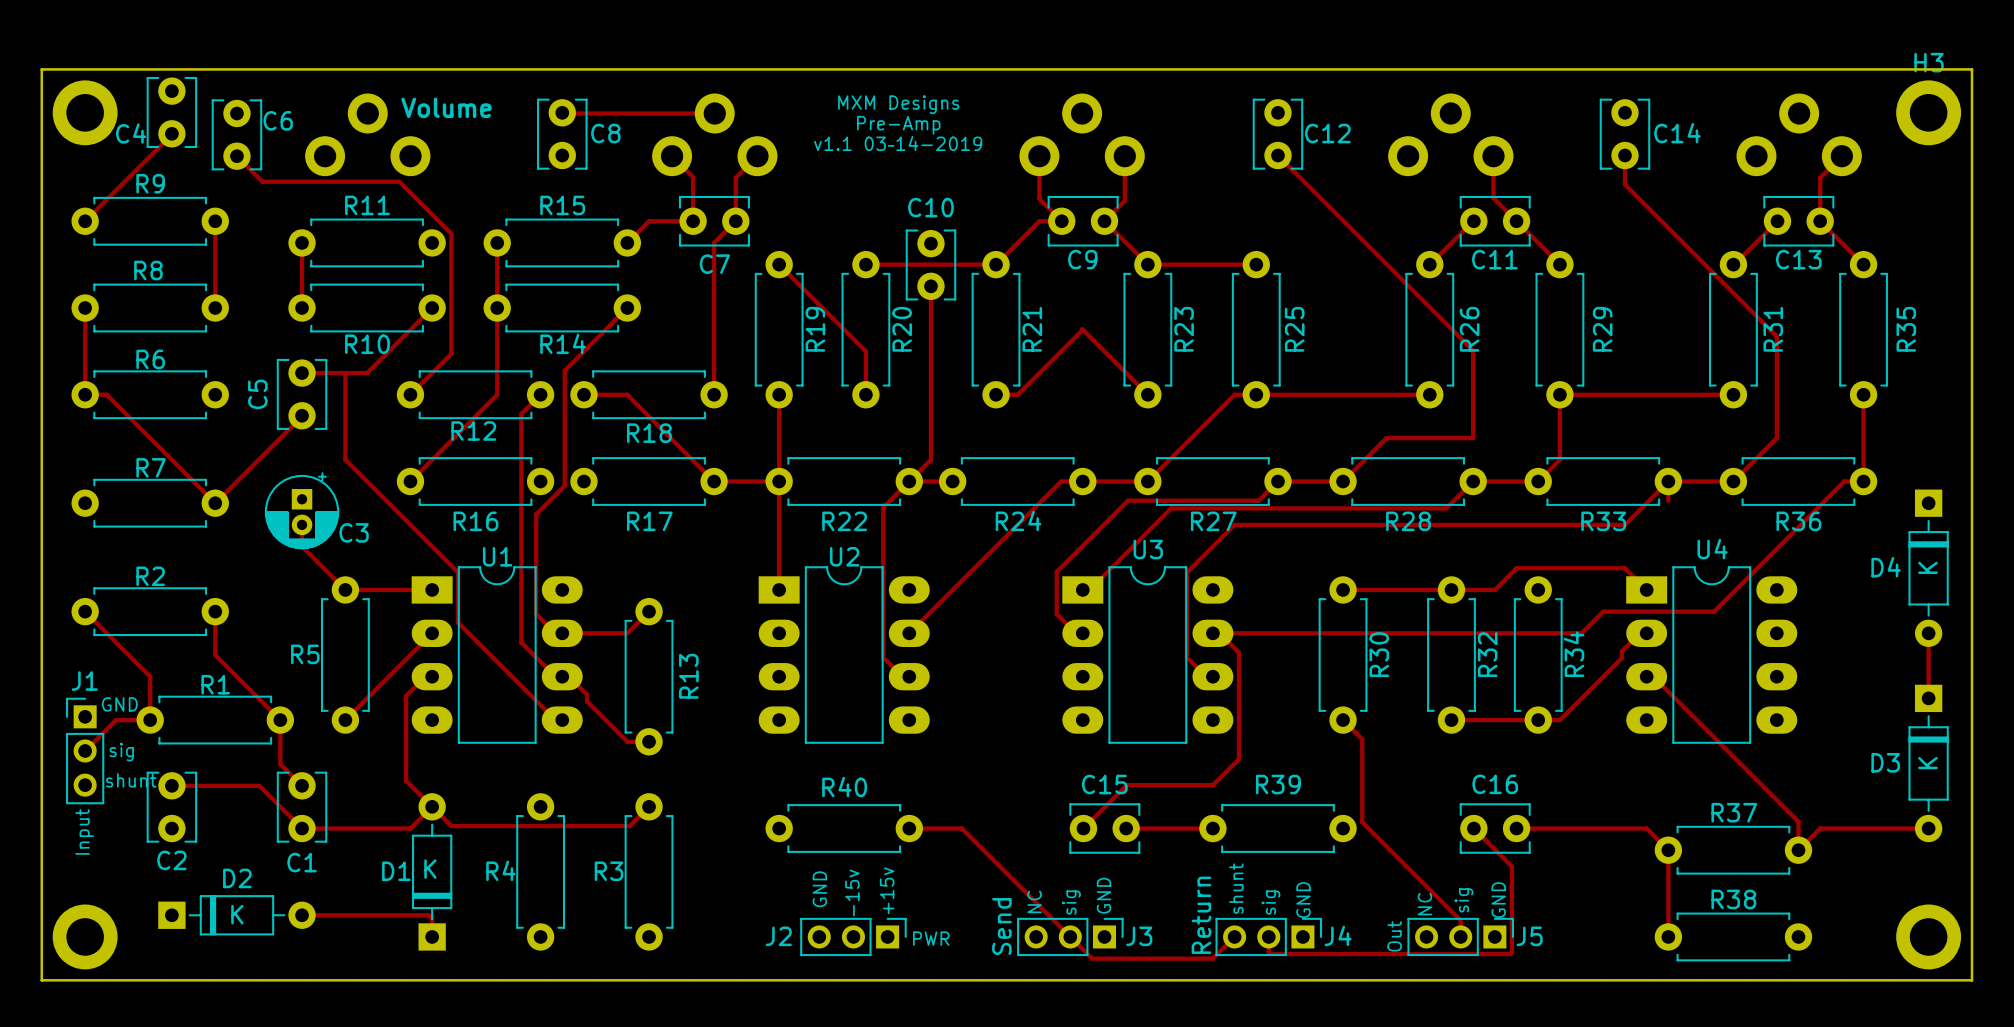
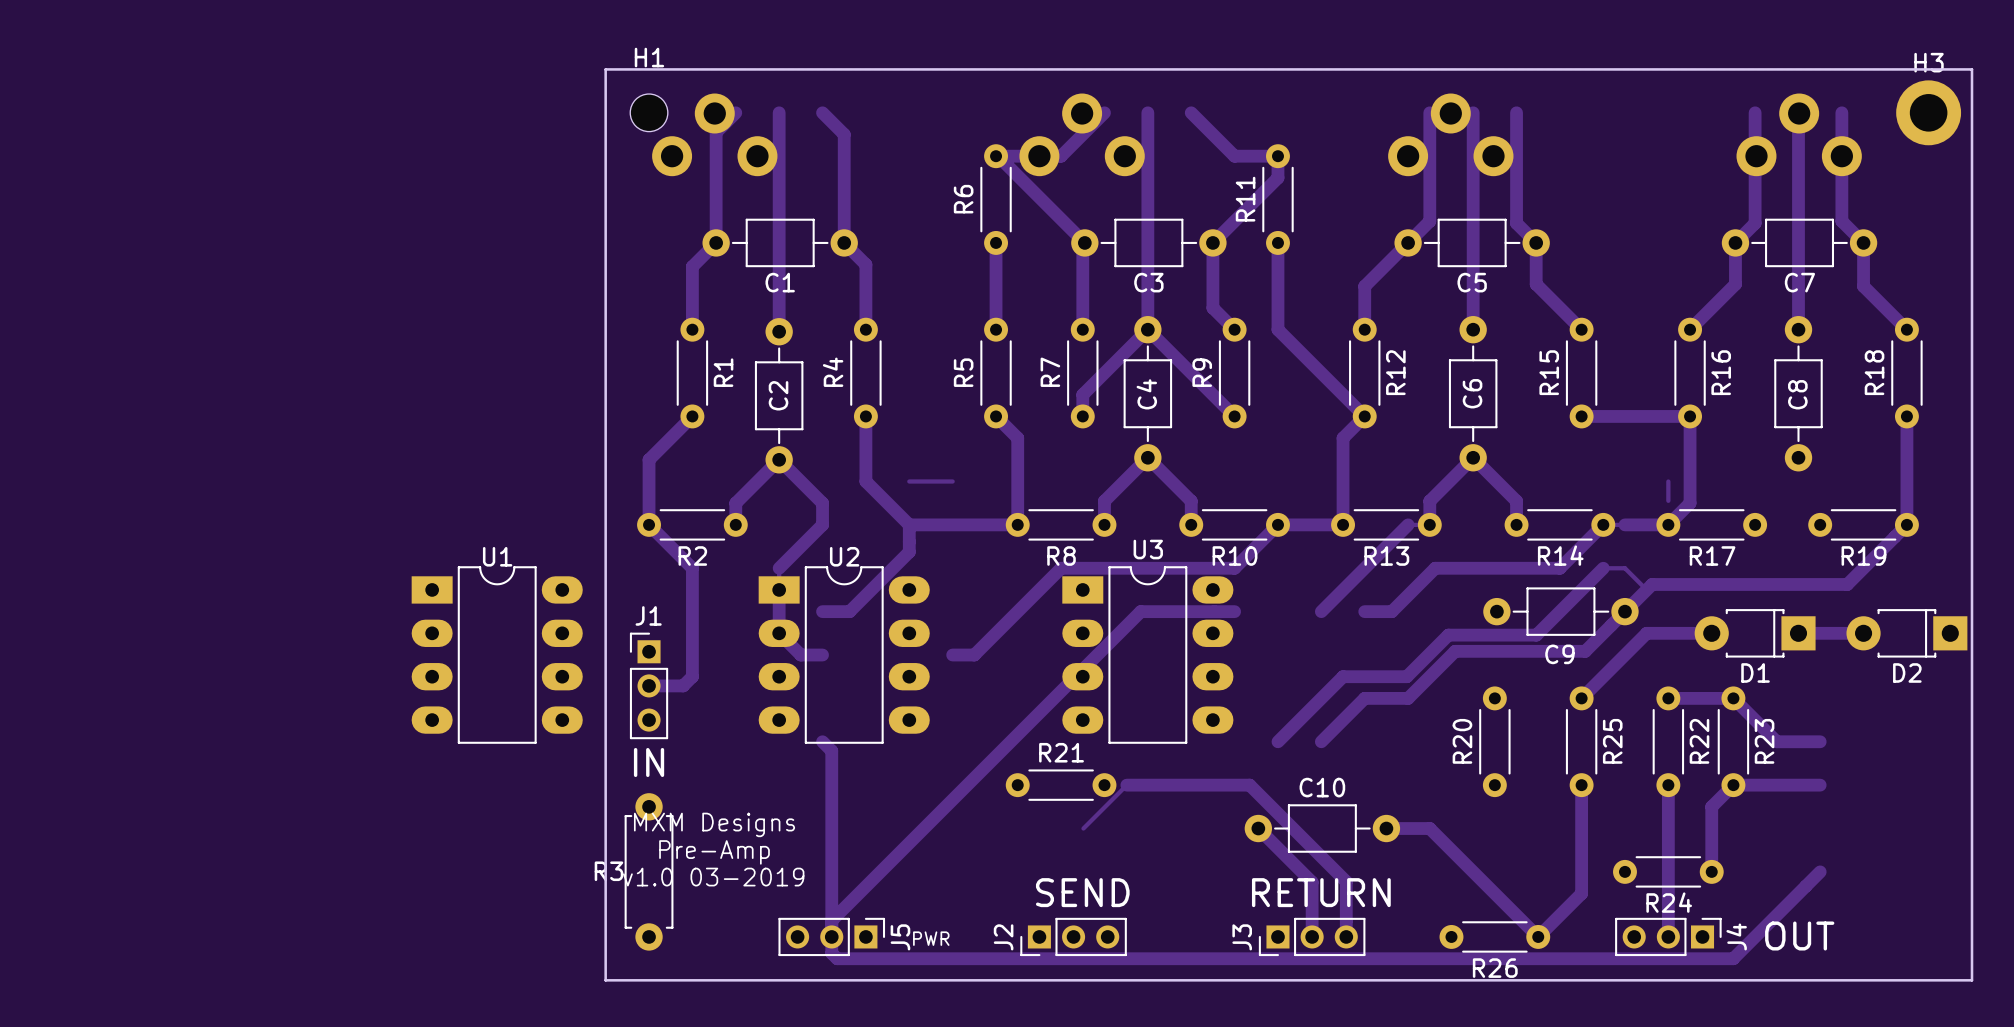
board edge: (605, 69) (41, 69) (41, 980) (605, 980) -> (605, 69) (605, 980)
C4 footprint: [146, 76, 198, 148] -> [1123, 316, 1173, 472]
C8 footprint: [537, 98, 588, 170] -> [1774, 316, 1823, 472]
C6 footprint: [211, 99, 263, 171] -> [1448, 316, 1498, 472]
text: MXM Designs (898, 104) -> none
text: Volume (446, 107) -> none
part: (85, 112) -> none
track: (562, 112) (714, 113) -> none
H1: none -> (649, 112)
track: none -> (735, 112) (716, 132) (716, 242) (692, 266) (692, 329)
track: none -> (779, 112) (779, 331)
track: none -> (822, 112) (844, 134) (844, 242) (865, 264) (865, 329)
track: none -> (1104, 112) (1061, 156) (996, 156)
track: none -> (1147, 112) (1147, 329)
track: none -> (1191, 112) (1234, 156) (1277, 156) (1277, 177) (1212, 242) (1212, 308) (1234, 329)
track: none -> (1429, 112) (1429, 221) (1364, 286) (1364, 329)
track: none -> (1473, 112) (1473, 329)
track: none -> (1516, 112) (1516, 223) (1536, 242) (1536, 284) (1581, 329)
track: none -> (1755, 112) (1755, 223) (1735, 242) (1735, 284) (1690, 329)
track: none -> (1798, 112) (1798, 329)
track: none -> (1841, 112) (1841, 221) (1863, 242) (1863, 286) (1906, 329)
C6 name position: C6 (278, 120) -> C6 (1472, 393)
text: Pre-Amp (898, 125) -> none
C4 name position: C4 (131, 133) -> C4 (1146, 394)
track: (171, 133) (85, 221) -> none
C8 name position: C8 (605, 133) -> C8 (1797, 394)
part: (367, 134) -> none
C12: (1277, 134) -> none
C14: (1624, 134) -> none
text: v1.1 03–14-2019 (898, 143) -> none
track: (1277, 155) (1473, 350) (1473, 438) (1386, 438) (1343, 481) (1277, 481) (1258, 500) (1127, 500) (1056, 571) (1056, 614) (1075, 633) (1082, 633) -> none
track: (1624, 155) (1624, 184) (1776, 336) (1776, 438) (1733, 481) (1668, 481) (1624, 524) -> (1581, 416) (1690, 416) (1690, 503) (1668, 524) (1624, 524)
track: (236, 156) (262, 181) (399, 181) (451, 233) (451, 353) (410, 394) -> none
track: (672, 156) (693, 177) (693, 221) (649, 221) (627, 242) -> none
track: (757, 156) (735, 177) (735, 221) (714, 242) (714, 394) -> none
track: none -> (998, 156) (1084, 242) (1082, 244) (1082, 329)
track: (1039, 156) (1039, 198) (1061, 221) (1039, 221) (996, 264) (865, 264) -> none
track: (1124, 156) (1124, 200) (1104, 221) (1147, 264) (1256, 264) -> none
track: (1493, 156) (1493, 198) (1559, 264) -> none
track: (1841, 156) (1820, 177) (1820, 221) (1863, 264) -> none
R9 name position: R9 (150, 183) -> R9 (1202, 372)
C7 footprint: [678, 195, 750, 247] -> [1721, 218, 1878, 268]
C9 footprint: [1047, 195, 1119, 247] -> [1483, 587, 1639, 636]
R9 footprint: [71, 196, 229, 246] -> [1218, 317, 1251, 429]
R11 name position: R11 (367, 205) -> R11 (1245, 199)
R15 name position: R15 (562, 205) -> R15 (1549, 372)
R11 footprint: [288, 218, 446, 268] -> [1262, 144, 1294, 255]
R15 footprint: [483, 218, 642, 268] -> [1565, 317, 1598, 429]
track: (215, 221) (215, 308) -> none
track: (1473, 221) (1429, 264) -> none
C11: (1495, 221) -> none
track: (1777, 221) (1733, 264) -> none
C13: (1798, 221) -> none
C10 footprint: [905, 229, 957, 301] -> [1244, 804, 1401, 853]
track: (302, 242) (302, 308) -> none
track: (497, 242) (497, 394) (410, 481) -> none
track: none -> (996, 242) (996, 329)
track: none -> (1277, 242) (1277, 329) (1364, 416) (1343, 438) (1343, 524)
R19 footprint: [754, 250, 804, 409] -> [1808, 509, 1919, 541]
R20 footprint: [841, 250, 891, 409] -> [1479, 686, 1511, 798]
R21 footprint: [971, 250, 1021, 409] -> [1005, 769, 1117, 801]
R23 footprint: [1123, 250, 1173, 409] -> [1717, 686, 1750, 798]
R25 footprint: [1231, 250, 1281, 409] -> [1565, 686, 1598, 798]
R26 footprint: [1405, 250, 1455, 409] -> [1439, 921, 1551, 953]
track: (779, 264) (865, 351) (865, 394) -> none
R8 name position: R8 (148, 270) -> R8 (1061, 556)
R8 footprint: [71, 283, 229, 333] -> [1005, 509, 1117, 541]
R10 footprint: [288, 283, 446, 333] -> [1179, 509, 1290, 541]
R14 footprint: [483, 283, 642, 333] -> [1504, 509, 1616, 541]
track: (930, 286) (930, 459) (883, 507) (883, 657) (902, 676) (909, 676) -> none
track: (85, 308) (85, 394) (106, 394) (215, 503) (302, 415) -> none
track: (432, 308) (367, 373) (302, 373) -> none
track: (627, 308) (564, 370) (564, 485) (536, 514) (536, 614) (555, 633) (627, 633) (649, 611) -> none
R19 name position: R19 (815, 329) -> R19 (1863, 556)
R20 name position: R20 (902, 329) -> R20 (1462, 741)
R21 name position: R21 (1032, 329) -> R21 (1061, 752)
track: (1082, 329) (1147, 394) -> none
track: none -> (1147, 329) (1082, 394) (1082, 416)
track: none -> (1147, 329) (1234, 416)
R26 name position: R26 (1469, 329) -> R26 (1495, 968)
R29: (1559, 329) -> none
R31: (1733, 329) -> none
R35: (1863, 329) -> none
track: (1082, 330) (1017, 394) (996, 394) -> none
C5 footprint: [276, 358, 328, 430] -> [1394, 218, 1550, 268]
R6 name position: R6 (150, 359) -> R6 (963, 199)
R6 footprint: [71, 370, 229, 420] -> [980, 144, 1012, 255]
R12 footprint: [396, 370, 555, 420] -> [1349, 317, 1381, 429]
R18 footprint: [570, 370, 728, 420] -> [1891, 317, 1923, 429]
track: (345, 373) (345, 459) (458, 572) (458, 622) (555, 720) (562, 720) -> none
C5 name position: C5 (257, 394) -> C5 (1472, 282)
track: (540, 394) (521, 413) (521, 642) (555, 676) (569, 676) (587, 694) (587, 701) (627, 741) (649, 741) -> none
track: (583, 394) (627, 394) (714, 481) (779, 481) -> none
track: (779, 394) (779, 568) -> (735, 524) (735, 503) (779, 459) (822, 503) (822, 524) (779, 568)
track: (1429, 394) (1234, 394) (1147, 481) (1061, 481) (909, 633) -> none
track: (1733, 394) (1559, 394) (1559, 459) (1538, 481) (1473, 481) (1446, 508) (1171, 508) (1089, 589) (1082, 589) -> none
track: (1863, 394) (1863, 481) (1844, 481) (1714, 611) (1603, 611) (1581, 633) (1206, 633) -> none
track: none -> (692, 416) (649, 459) (649, 524) (692, 568) (692, 676) (683, 685) (649, 685)
track: none -> (865, 416) (865, 481) (909, 524)
track: none -> (996, 416) (1017, 438) (1017, 524) (909, 524)
track: none -> (1906, 416) (1906, 524) (1847, 584) (1652, 584) (1585, 651) (1455, 651) (1408, 698) (1364, 698) (1321, 741)
R12 name position: R12 (473, 430) -> R12 (1395, 372)
R18 name position: R18 (649, 433) -> R18 (1874, 372)
R16 footprint: [396, 457, 555, 506] -> [1674, 317, 1706, 429]
R17 footprint: [570, 457, 728, 506] -> [1656, 509, 1768, 541]
R22 footprint: [765, 457, 923, 506] -> [1652, 686, 1685, 798]
R24 footprint: [939, 457, 1097, 506] -> [1613, 856, 1724, 888]
R7 name position: R7 (151, 467) -> R7 (1050, 372)
C3 footprint: [264, 472, 340, 550] -> [1071, 218, 1227, 268]
R7 footprint: [71, 478, 229, 528] -> [1067, 317, 1099, 429]
R27: (1212, 481) -> none
R28: (1408, 481) -> none
R33: (1603, 481) -> none
R36: (1798, 481) -> none
R16 name position: R16 (475, 521) -> R16 (1721, 372)
R22 name position: R22 (844, 521) -> R22 (1699, 741)
track: (302, 524) (302, 546) (345, 589) (432, 589) -> none
track: none -> (909, 524) (909, 552) (849, 611) (822, 611)
track: none -> (1104, 524) (1104, 501) (1147, 457) (1191, 501) (1191, 524)
track: (1277, 524) (1234, 524) (1186, 572) (1186, 657) (1206, 676) (1212, 676) -> (1277, 524) (1234, 568) (1061, 568) (974, 655) (952, 655)
track width: thin (1277, 524) (1343, 524) -> thick (1277, 524) (1343, 524)
track: (1343, 524) (1408, 524) -> (1321, 611) (1408, 524)
track: (1429, 524) (1603, 524) -> (1429, 524) (1429, 501) (1473, 457) (1516, 501) (1516, 524)
C3 name position: C3 (354, 532) -> C3 (1148, 282)
track: (1516, 568) (1494, 589) (1343, 589) -> (1516, 568) (1435, 568) (1391, 611) (1364, 611)
track width: thin (1516, 568) (1559, 568) -> thick (1516, 568) (1559, 568)
track: (1559, 568) (1603, 568) -> (1559, 568) (1603, 524)
track: none -> (1603, 568) (1536, 635) (1448, 635) (1406, 676) (1343, 676) (1277, 741)
D4: (1928, 568) -> none
R2 name position: R2 (150, 576) -> R2 (692, 556)
R5 footprint: [320, 576, 370, 734] -> [980, 317, 1012, 429]
R2 footprint: [71, 587, 229, 637] -> [637, 509, 748, 541]
track: none -> (779, 589) (779, 633) (800, 655) (822, 655)
R13 footprint: [624, 597, 674, 756] -> [1331, 509, 1442, 541]
track: (85, 611) (150, 676) (150, 720) (116, 720) (85, 750) -> none
track: (215, 611) (215, 655) (280, 720) (280, 764) (302, 785) -> none
track: none -> (1234, 611) (1140, 611) (831, 920)
track: (432, 633) (345, 720) -> none
track: (1219, 633) (1238, 652) (1238, 759) (1212, 785) -> (1346, 936) (1346, 881) (1249, 785) (1212, 785)
track: (1646, 633) (1639, 633) (1621, 651) (1621, 658) -> (1711, 633) (1646, 633) (1621, 658)
track: none -> (1798, 633) (1863, 633)
track: (1928, 633) (1928, 698) -> none
R30: (1343, 655) -> none
R32: (1451, 655) -> none
R34: (1538, 655) -> none
U4: (1711, 655) -> none
track width: thin (1621, 658) (1581, 698) -> thick (1621, 658) (1581, 698)
track: (432, 676) (425, 676) (406, 695) (406, 780) (451, 826) (629, 826) (649, 806) -> none
R13 name position: R13 (688, 676) -> R13 (1386, 556)
track: (1646, 676) (1653, 676) (1798, 821) (1798, 850) (1820, 828) (1928, 828) -> none
R1 name position: R1 (215, 684) -> R1 (723, 372)
R1 footprint: [136, 695, 295, 745] -> [676, 317, 709, 429]
track: (1581, 698) (1559, 720) (1451, 720) -> none
track: none -> (1668, 698) (1733, 698) (1776, 741) (1820, 741)
text: GND (119, 704) -> none
track: (1343, 720) (1362, 739) (1362, 822) (1460, 920) (1460, 936) -> none
track: none -> (822, 741) (831, 750) (831, 953) (837, 958) (1733, 958) (1820, 871)
J1 position: (85, 750) -> (649, 685)
text: sig (121, 752) -> none
text: none -> IN (649, 762)
D3: (1928, 763) -> none
C2 footprint: [146, 771, 198, 843] -> [754, 318, 804, 474]
C1 footprint: [276, 771, 328, 843] -> [702, 218, 858, 268]
text: shunt (131, 780) -> none
track: (171, 785) (259, 785) (302, 828) (410, 828) (432, 806) -> none
track width: thin (1126, 785) (1212, 785) -> thick (1126, 785) (1212, 785)
track: none -> (1581, 785) (1581, 893) (1538, 936) (1429, 828) (1386, 828)
track: none -> (1820, 785) (1733, 785) (1711, 806) (1711, 871)
D1 footprint: [412, 793, 453, 951] -> [1694, 609, 1816, 658]
R4 footprint: [516, 793, 566, 951] -> [850, 317, 882, 429]
text: none -> MXM Designs (714, 824)
R40: (844, 828) -> none
track: (909, 828) (961, 828) (1092, 958) (1212, 958) (1234, 936) -> none
C15: (1104, 828) -> none
track: (1126, 828) (1212, 828) -> none
track: none -> (1258, 828) (1312, 882) (1312, 936)
R39: (1277, 828) -> none
track: (1473, 828) (1511, 866) (1510, 954) (1269, 954) (1268, 936) -> none
C16: (1495, 828) -> none
track: (1516, 828) (1646, 828) (1668, 850) -> (1668, 785) (1668, 850)
text: Input (84, 831) -> none
track width: thin (1668, 850) (1668, 936) -> thick (1668, 850) (1668, 936)
R37: (1733, 850) -> none
text: none -> Pre-Amp (714, 852)
C2 name position: C2 (171, 860) -> C2 (778, 395)
D1 name position: D1 (396, 871) -> D1 (1755, 672)
text: none -> v1.0 03-2019 (713, 877)
D2 name position: D2 (237, 878) -> D2 (1907, 672)
text: shunt (1236, 888) -> none
text: GND (819, 889) -> none
text: +15v (887, 890) -> none
text: -15v (852, 892) -> none
text: none -> SEND (1082, 892)
text: none -> RETURN (1321, 892)
D2 footprint: [158, 895, 316, 936] -> [1846, 609, 1968, 658]
text: GND (1104, 895) -> none
text: GND (1303, 900) -> none
text: sig (1463, 900) -> none
text: GND (1498, 900) -> none
text: NC (1034, 901) -> none
text: sig (1071, 902) -> none
text: sig (1270, 902) -> none
text: NC (1424, 904) -> none
track: (302, 915) (428, 915) (432, 919) (432, 936) -> none
J4 value: Return (1201, 915) -> none
J3 value: Send (1001, 926) -> none
J4 name rotation: 0° (1338, 935) -> 90° counterclockwise (1736, 936)
part: (85, 936) -> none
J2 rotation: 0° (853, 936) -> 180° (1073, 936)
J2 position: (853, 936) -> (1073, 936)
J3 rotation: 0° (1070, 936) -> 180° (1312, 936)
J3 position: (1070, 936) -> (1312, 936)
J4 position: (1268, 936) -> (1668, 936)
text: Out (1394, 936) -> none
J5 position: (1460, 936) -> (831, 936)
J5 name rotation: 0° (1529, 936) -> 90° counterclockwise (900, 937)
R38: (1733, 936) -> none
text: none -> OUT (1799, 936)
part: (1928, 936) -> none

